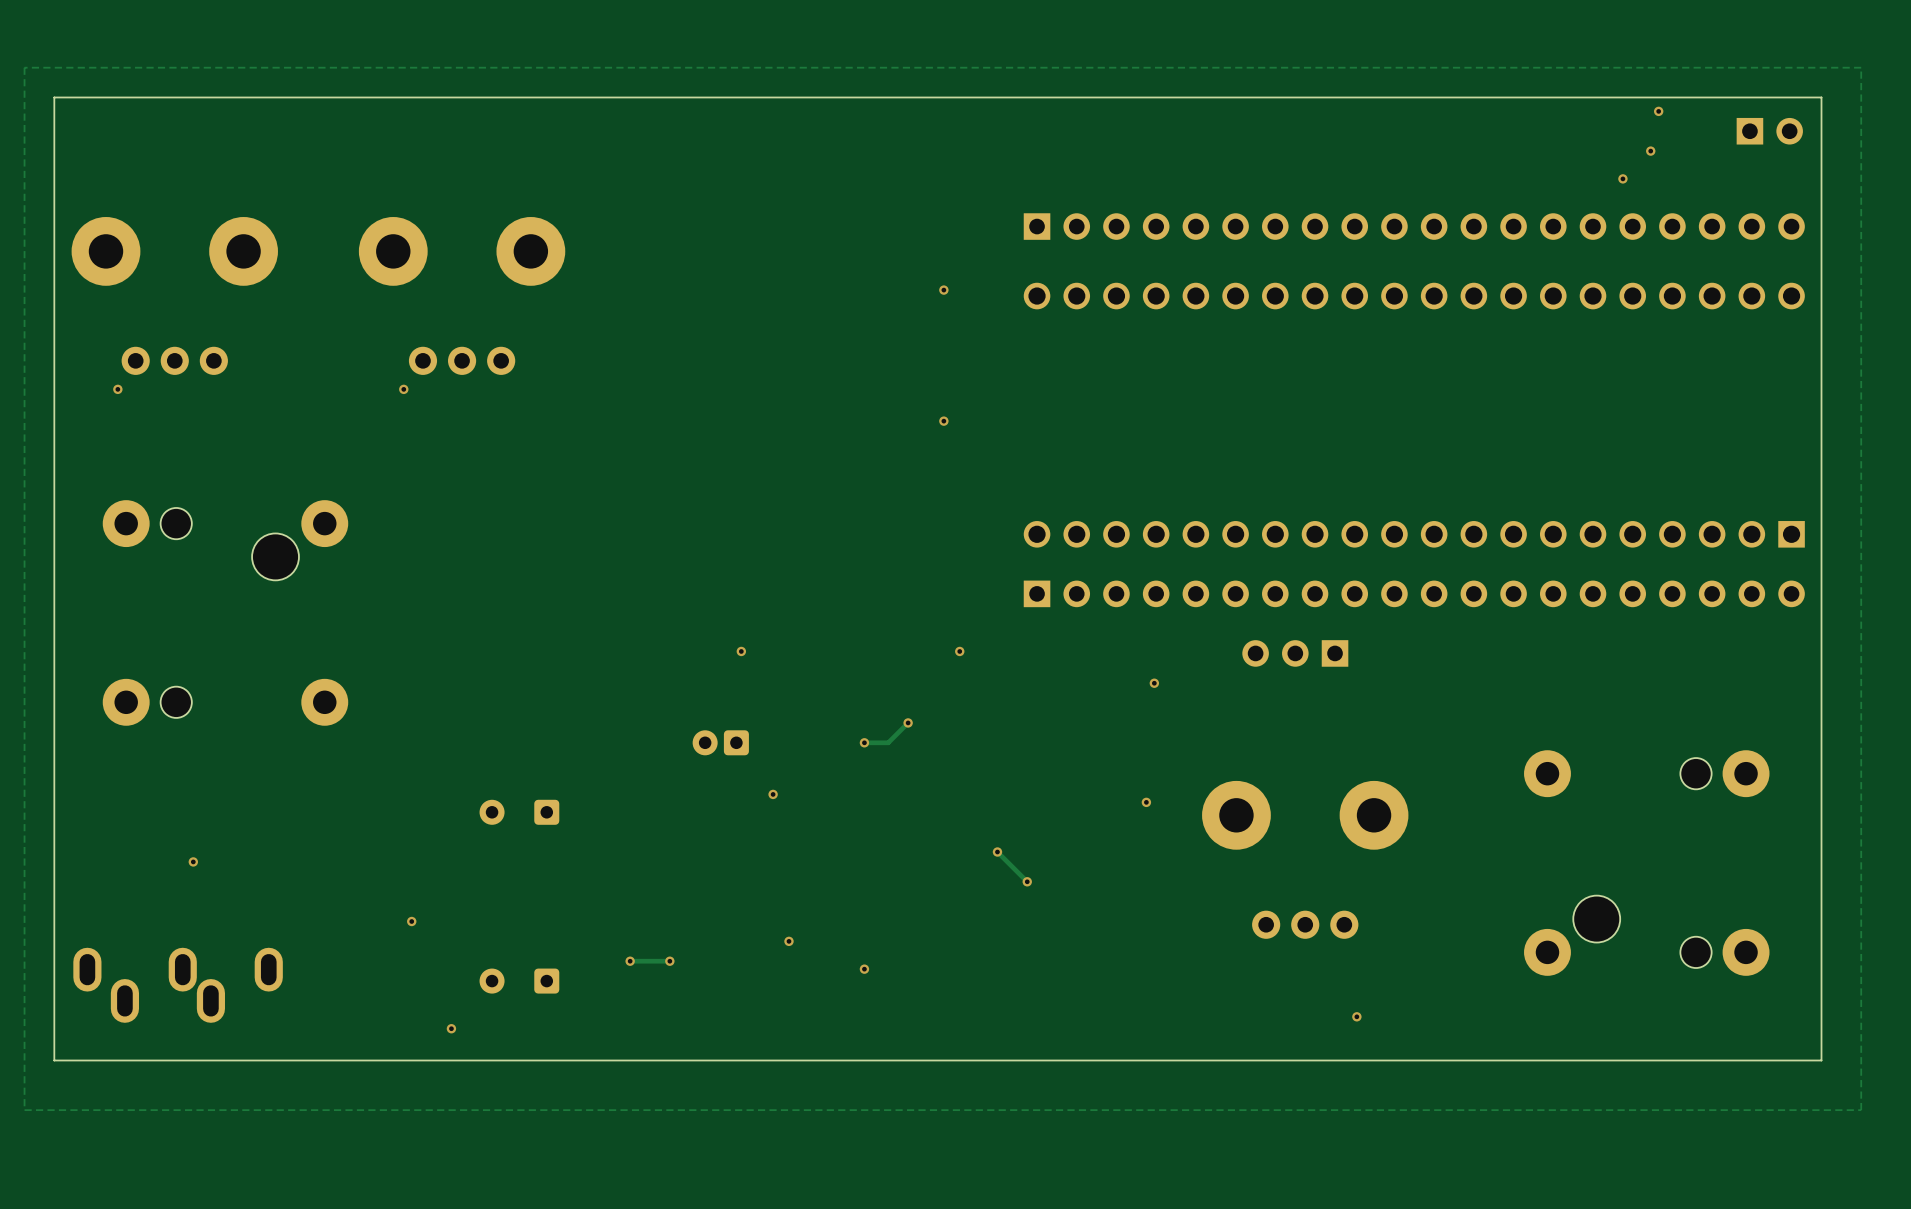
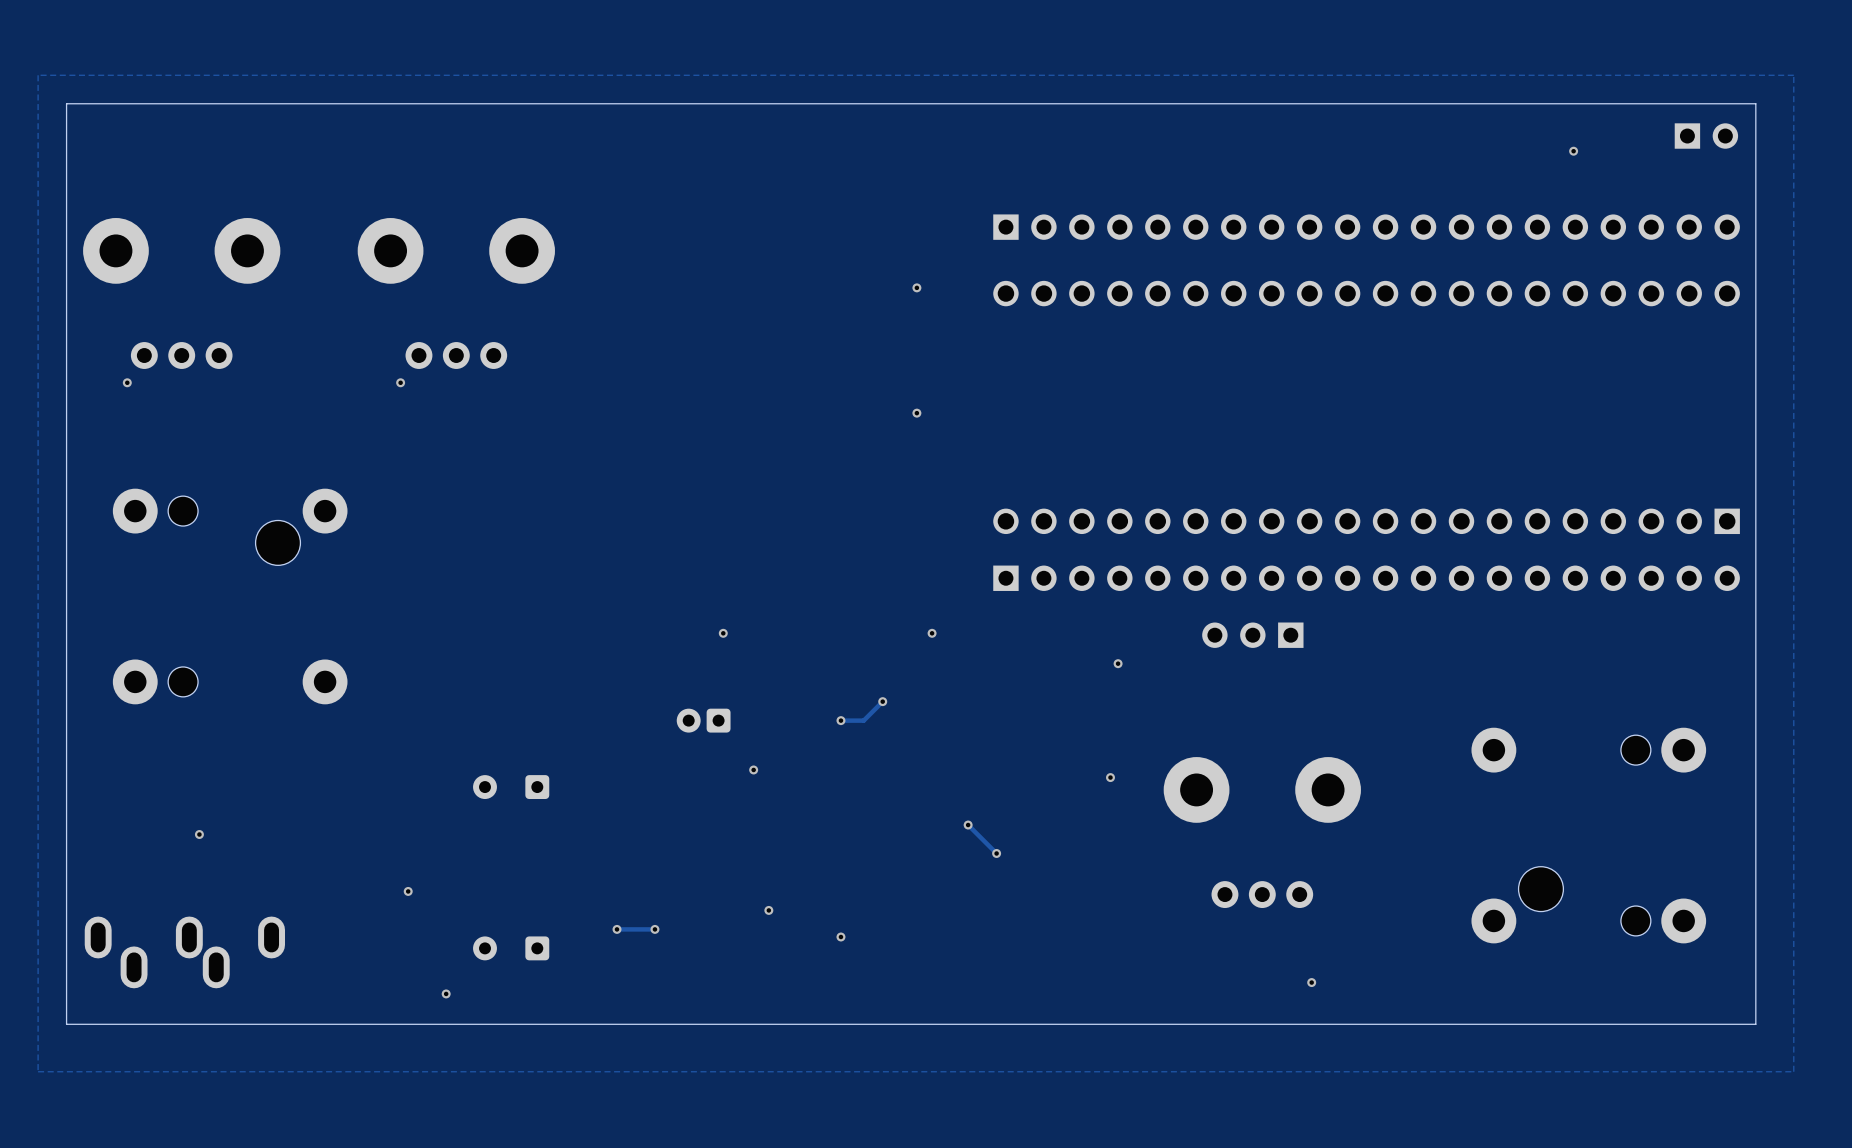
via: (1658, 111) -> none
via: none -> (1573, 151)
via: (1650, 151) -> none
via: (1622, 178) -> none

